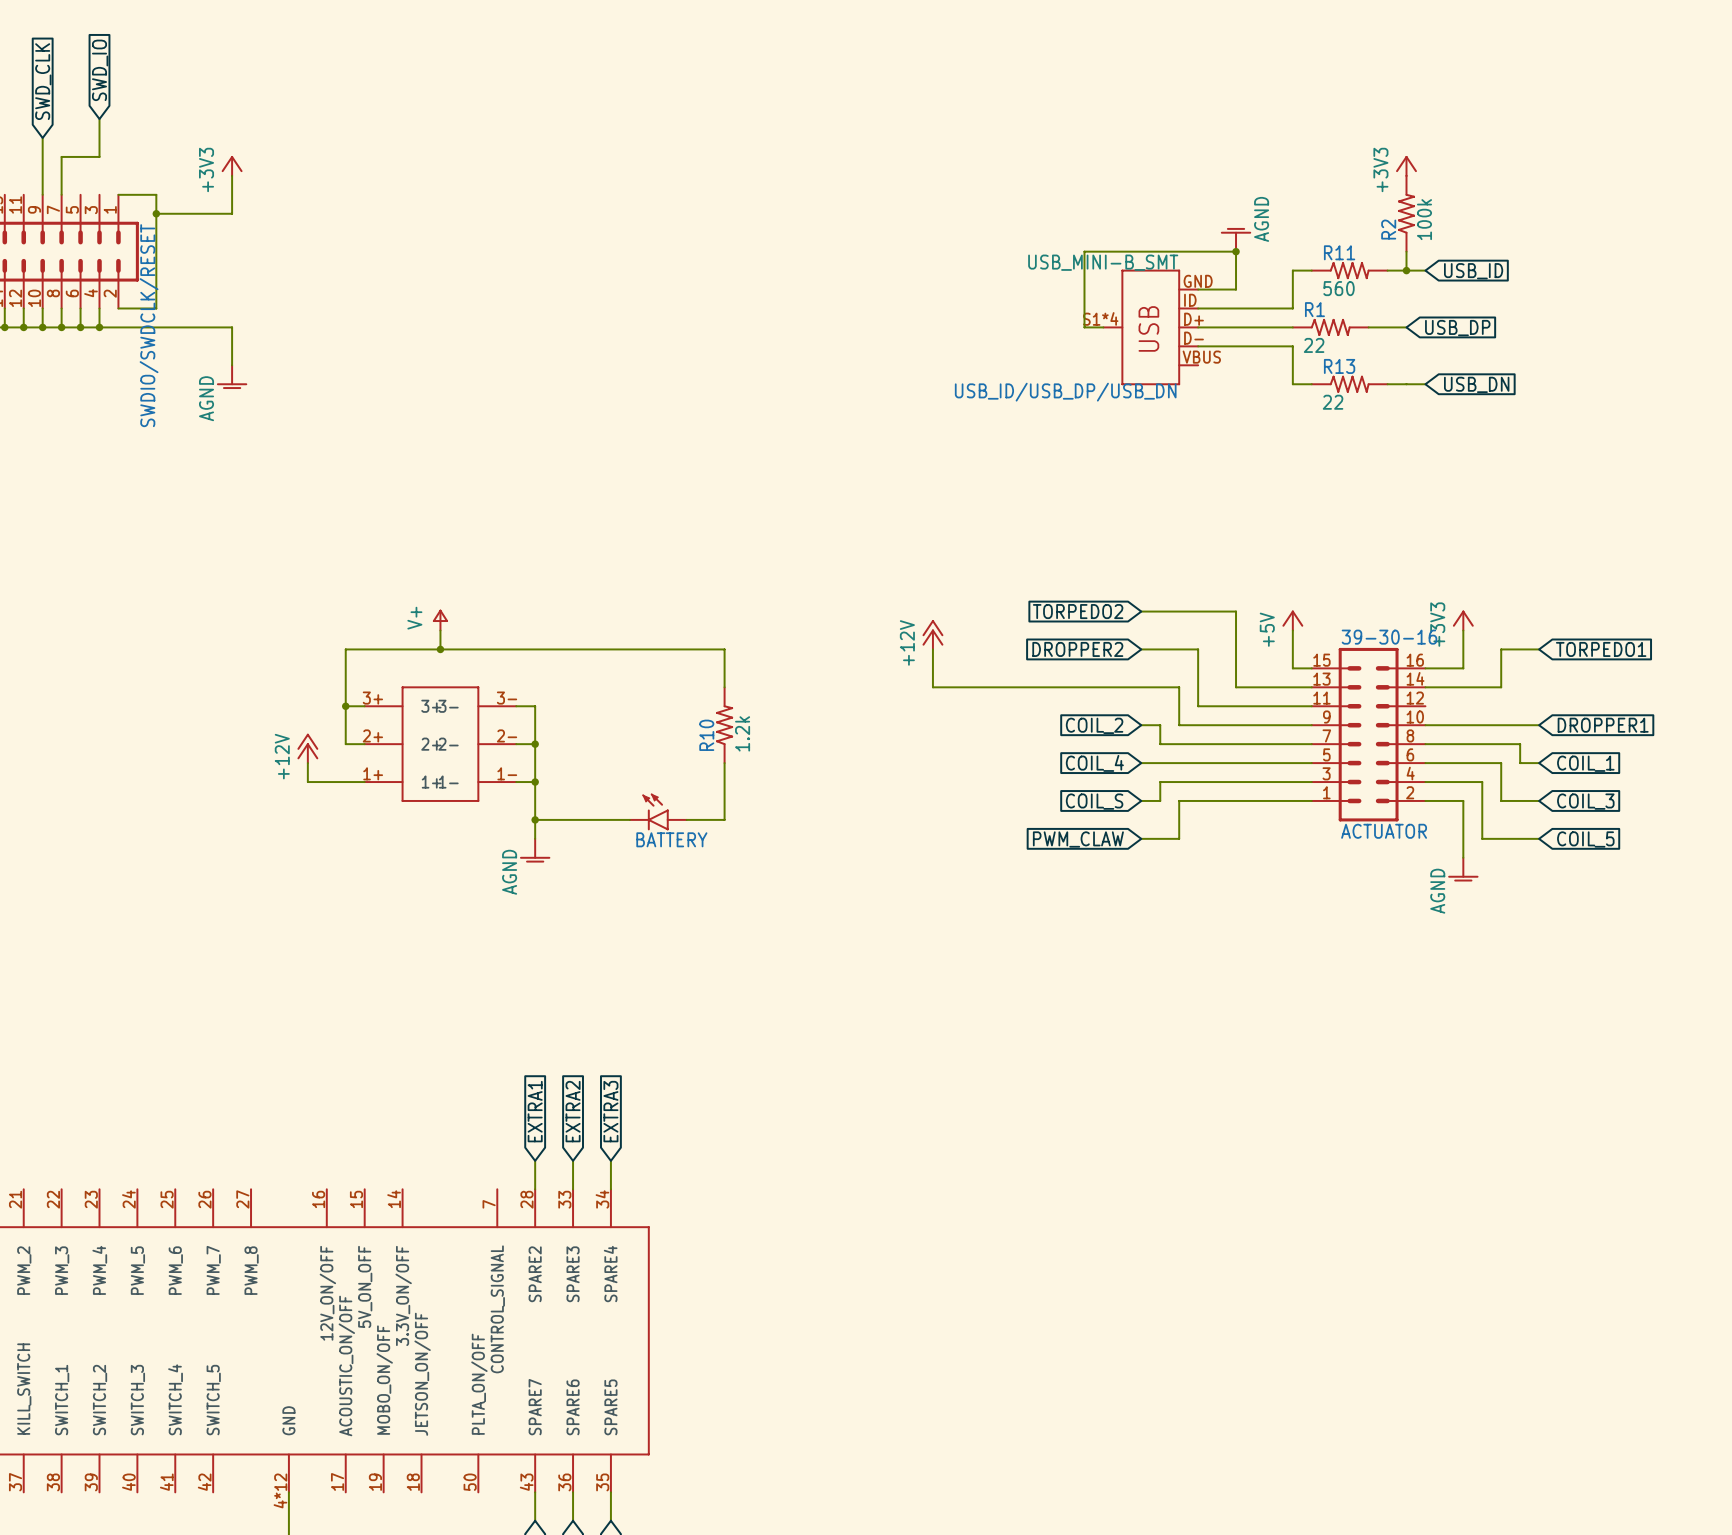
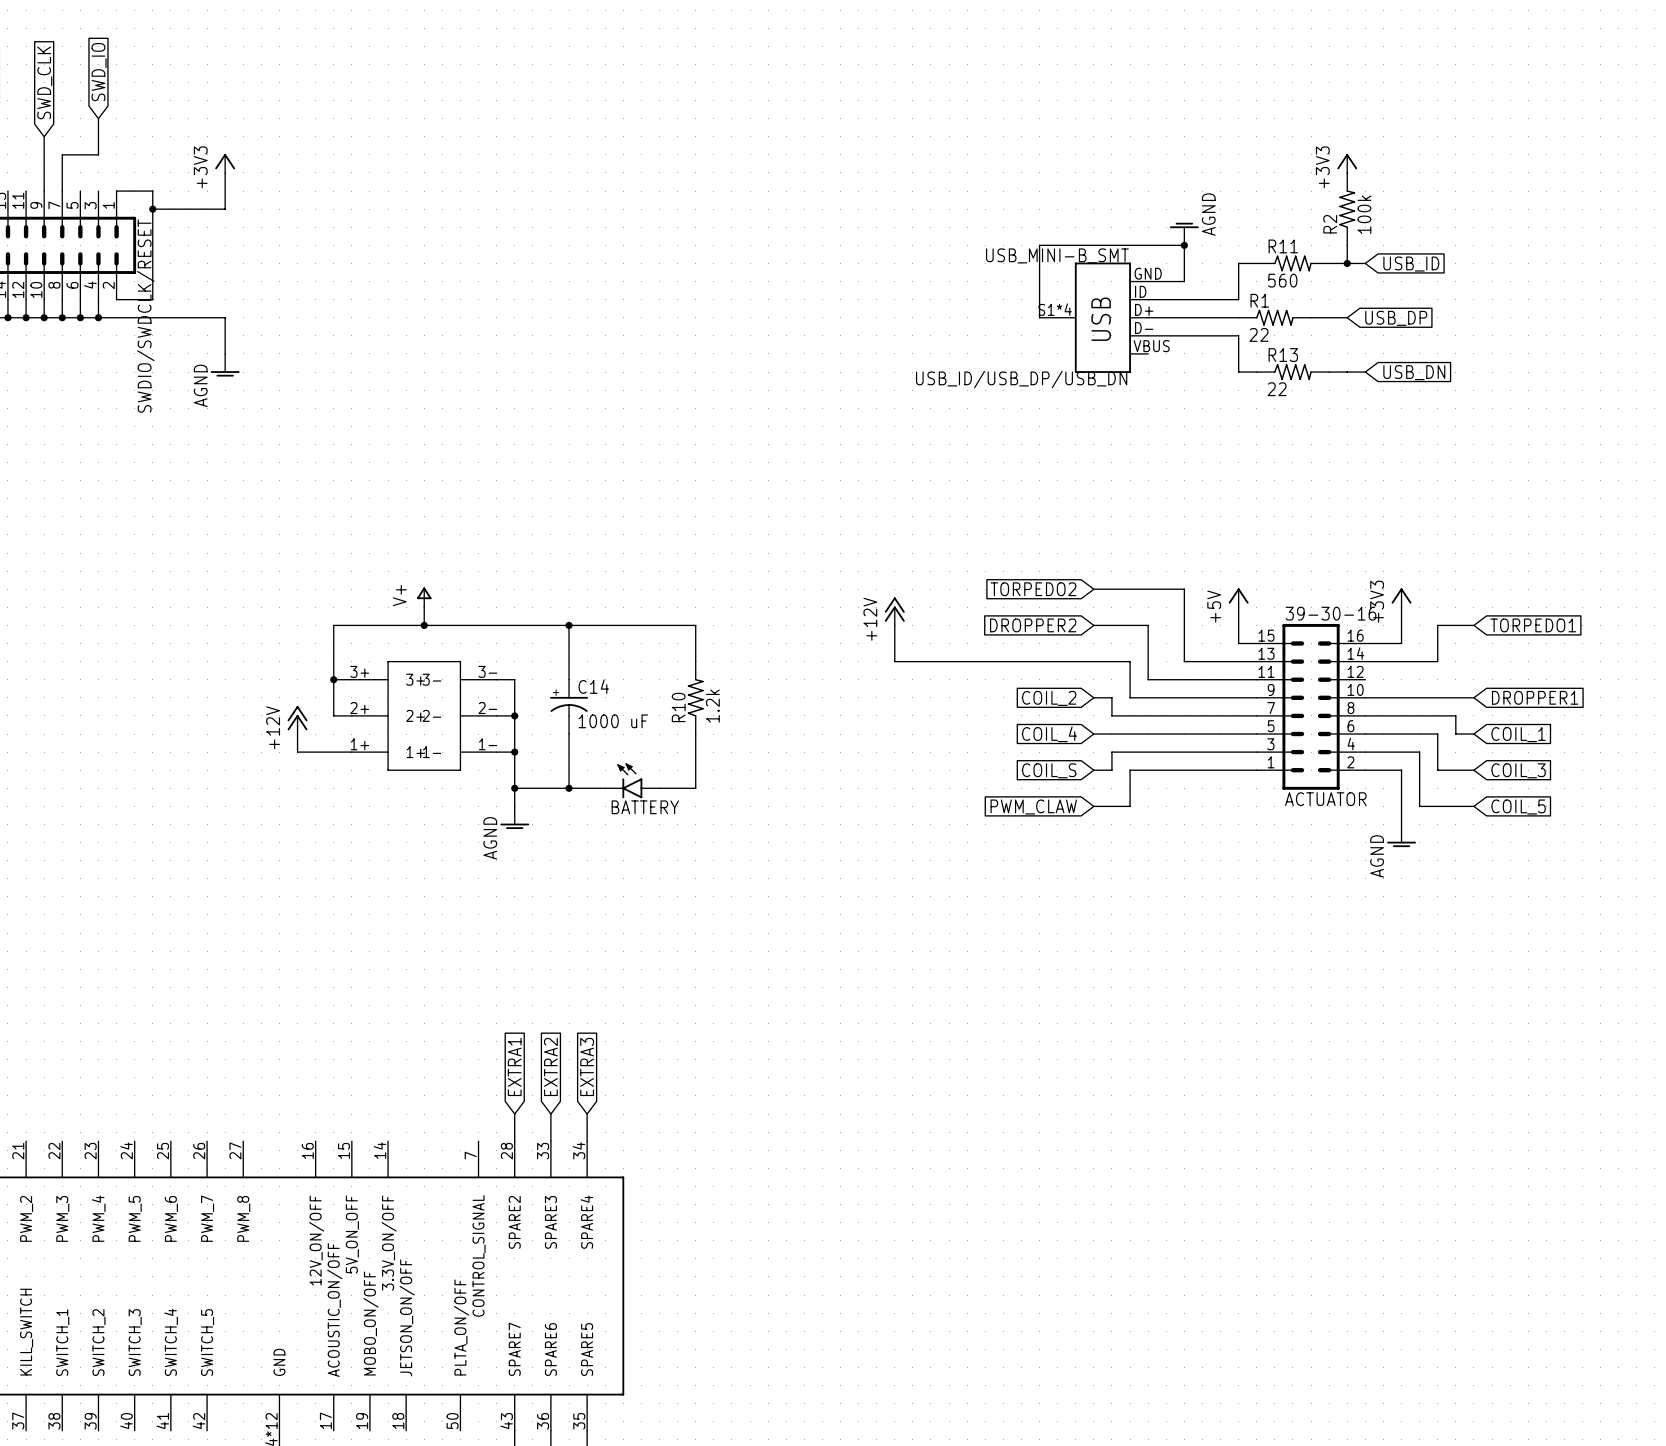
wire: none -> (569, 625) (569, 679)
junction: none -> (569, 625)
C14: none -> 1000 uF (569, 706)
wire: none -> (569, 734) (569, 788)
junction: none -> (569, 788)

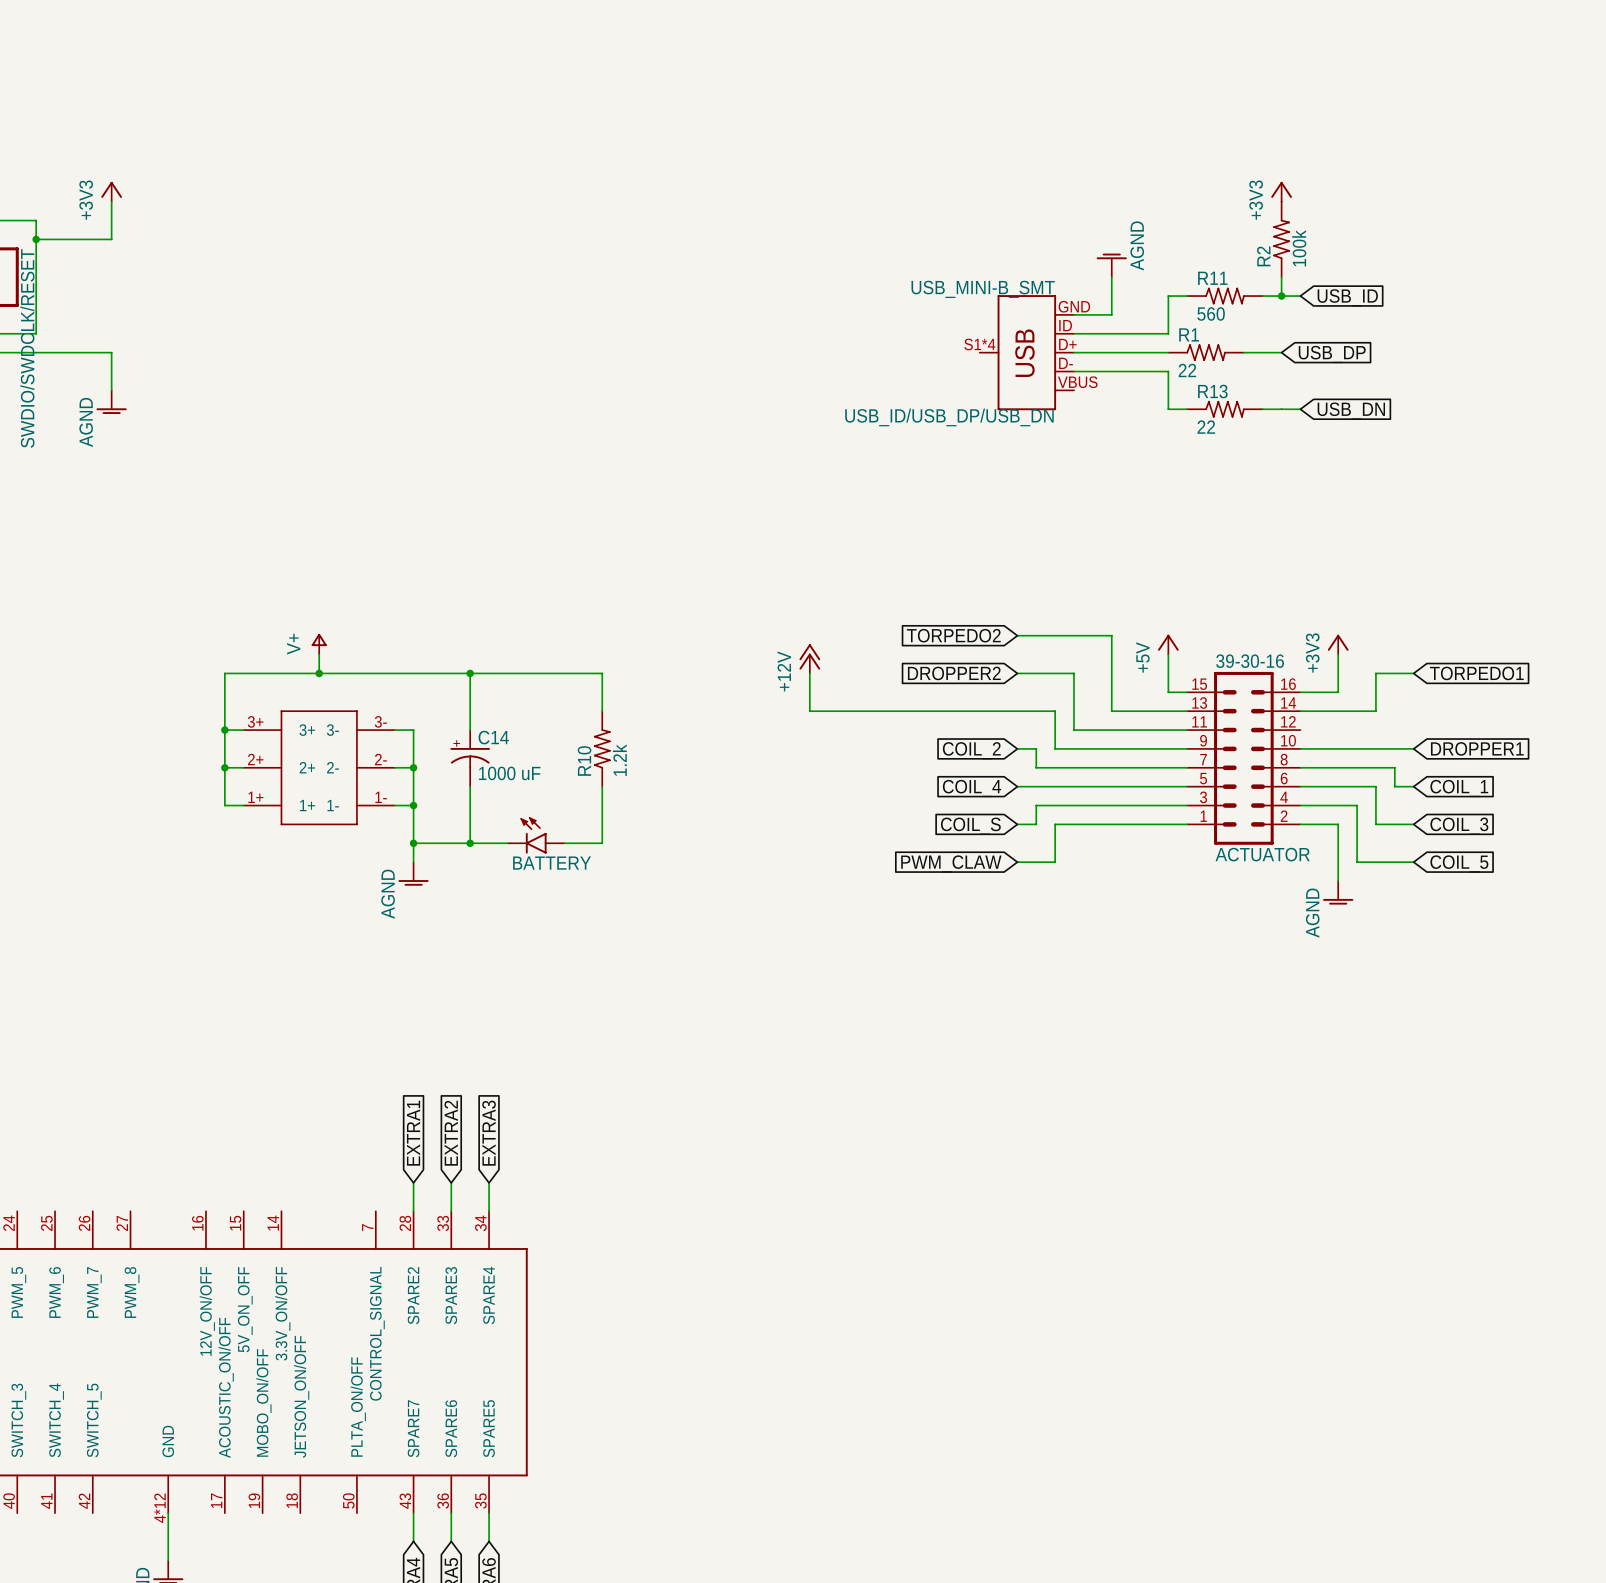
wire: (1184, 245) (1039, 245) (1039, 317) (1057, 317) -> none
junction: (1184, 245) -> none
junction: none -> (224, 767)
power symbol: +12V (297, 719) -> none
wire: (297, 734) (297, 752) (333, 752) -> (224, 767) (224, 805)

